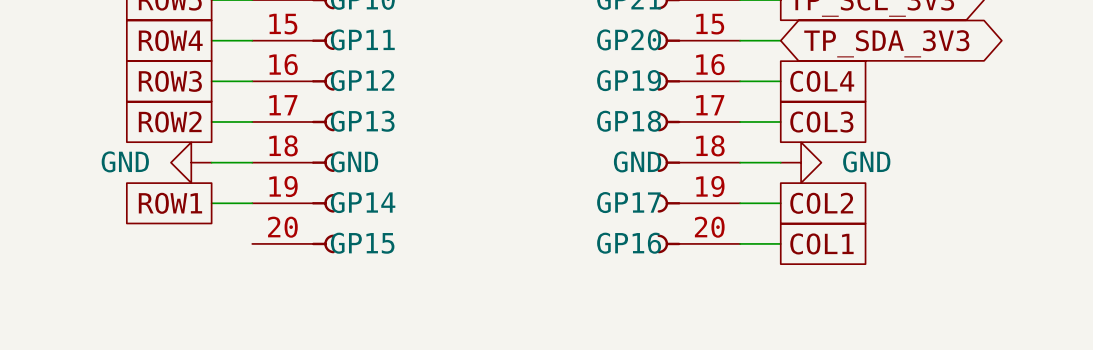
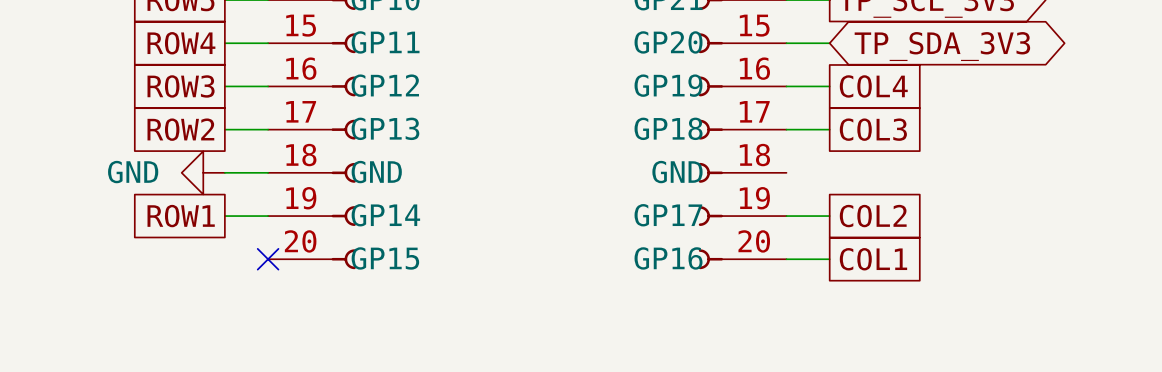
wire: (740, 162) (780, 162) -> none
power symbol: GND (801, 162) -> none
no-connect mark: none -> (268, 259)

